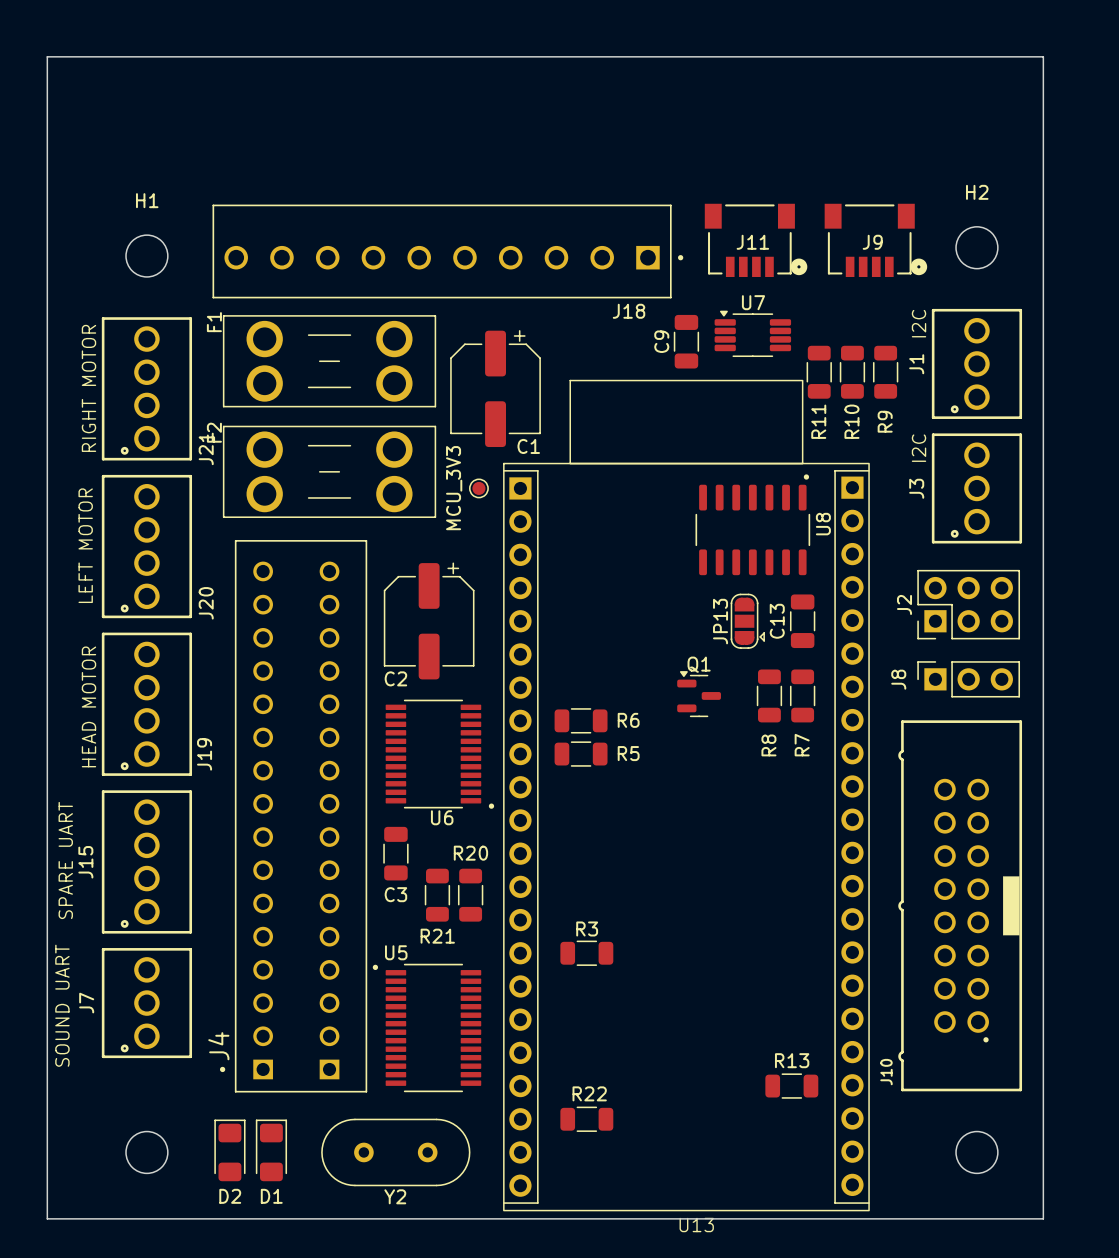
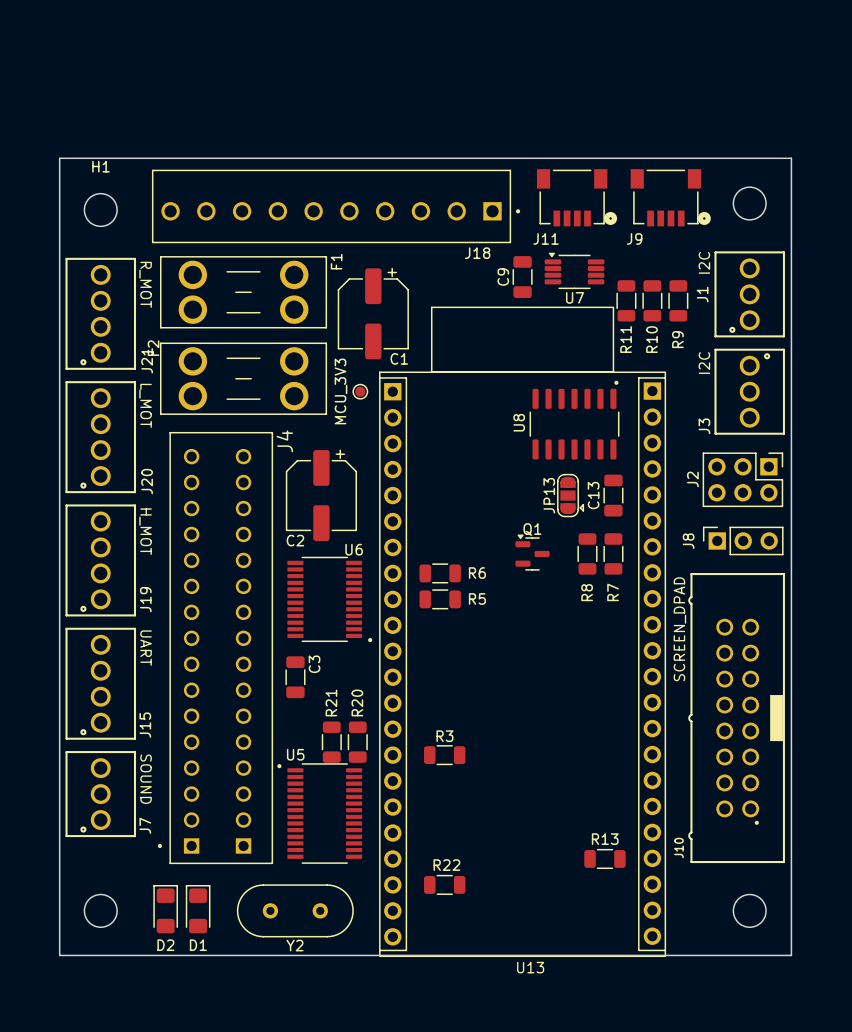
board edge: (47, 56) (1043, 56) (1043, 1218) (47, 1218) (47, 56) -> (59, 158) (59, 955) (791, 955) (791, 158) (59, 158)
H2 name: H2 (977, 192) -> none
J11 name position: J11 (752, 242) -> J11 (546, 238)
J9 name position: J9 (872, 242) -> J9 (634, 238)
U7 name position: U7 (753, 302) -> U7 (574, 297)
F1 name position: F1 (214, 322) -> F1 (336, 261)
J21 text: none -> R_MOT (145, 284)
J21 text: RIGHT MOTOR (88, 388) -> none
J3 footprint: [931, 433, 1023, 544] -> [714, 348, 785, 435]
J3 name position: J3 (916, 488) -> J3 (704, 426)
J20 text: none -> L_MOT (145, 405)
U8 name position: U8 (823, 524) -> U8 (519, 422)
J20 text: LEFT MOTOR (85, 545) -> none
J2 rotation: 0° (968, 604) -> 180° (742, 479)
J19 text: none -> H_MOT (145, 531)
J19 text: HEAD MOTOR (88, 706) -> none
J10 text: none -> SCREEN_DPAD (679, 629)
J15 text: none -> UART (146, 648)
U6 name position: U6 (442, 817) -> U6 (354, 549)
R20 name rotation: 0° (470, 853) -> 90° counterclockwise (357, 702)
J15 text: SPARE UART (65, 860) -> none
J15 name position: J15 (85, 862) -> J15 (145, 725)
C3 name rotation: 0° (395, 894) -> 90° counterclockwise (314, 664)
C3 name position: C3 (395, 894) -> C3 (314, 664)
R21 position: (437, 895) -> (331, 742)
R20 position: (470, 895) -> (357, 742)
R21 name rotation: 0° (437, 936) -> 90° counterclockwise (331, 702)
R21 name position: R21 (437, 936) -> R21 (331, 702)
J7 text: none -> SOUND (146, 779)
J7 name position: J7 (86, 1003) -> J7 (145, 825)
J7 text: SOUND UART (62, 1005) -> none
J4 name position: J4 (218, 1046) -> J4 (284, 441)

